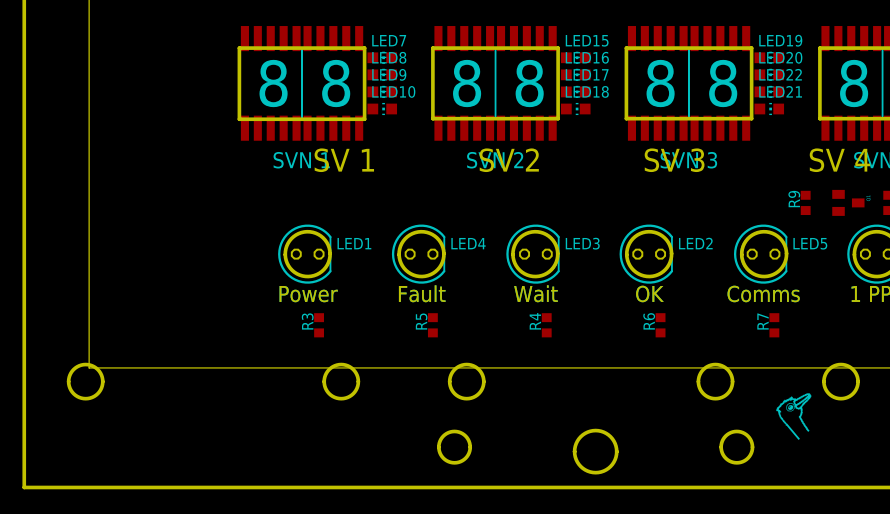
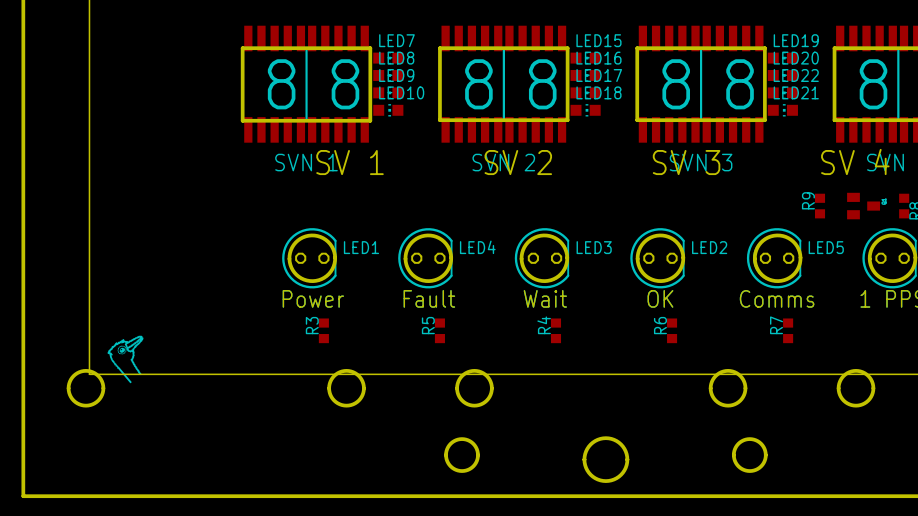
drawing: none -> [107, 335, 144, 384]
drawing: [776, 393, 812, 440] -> none

